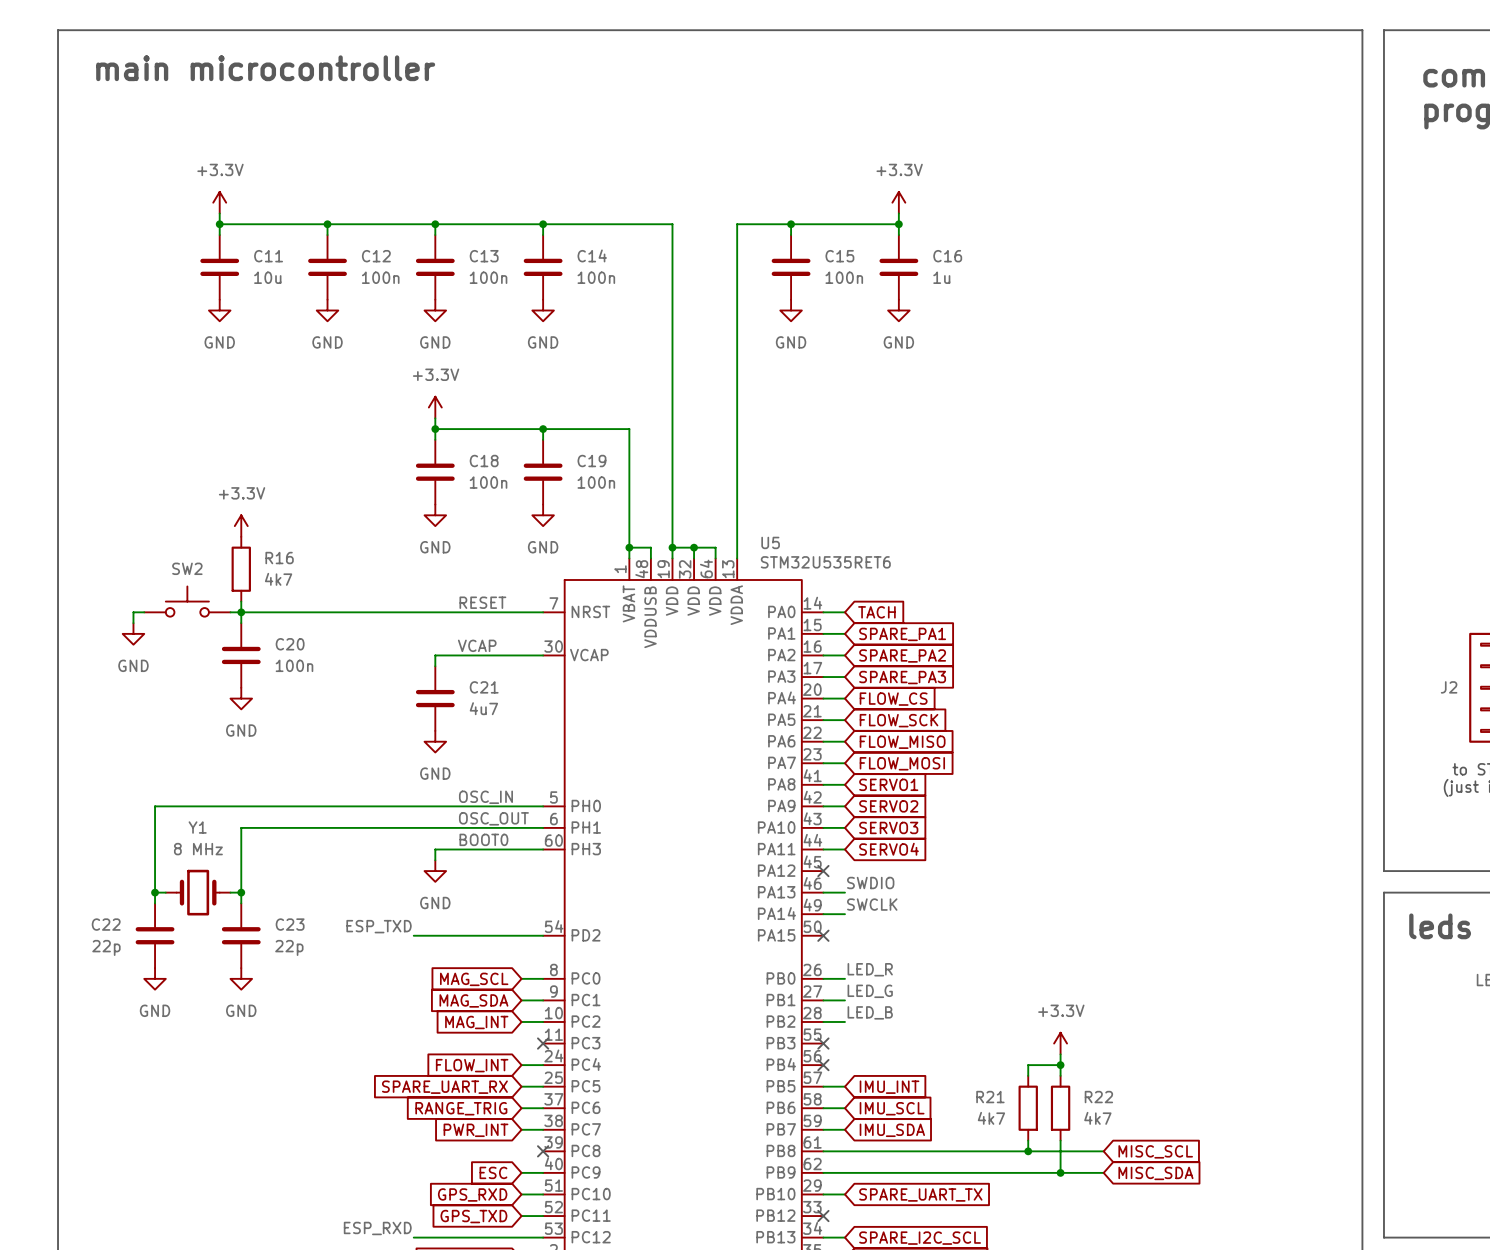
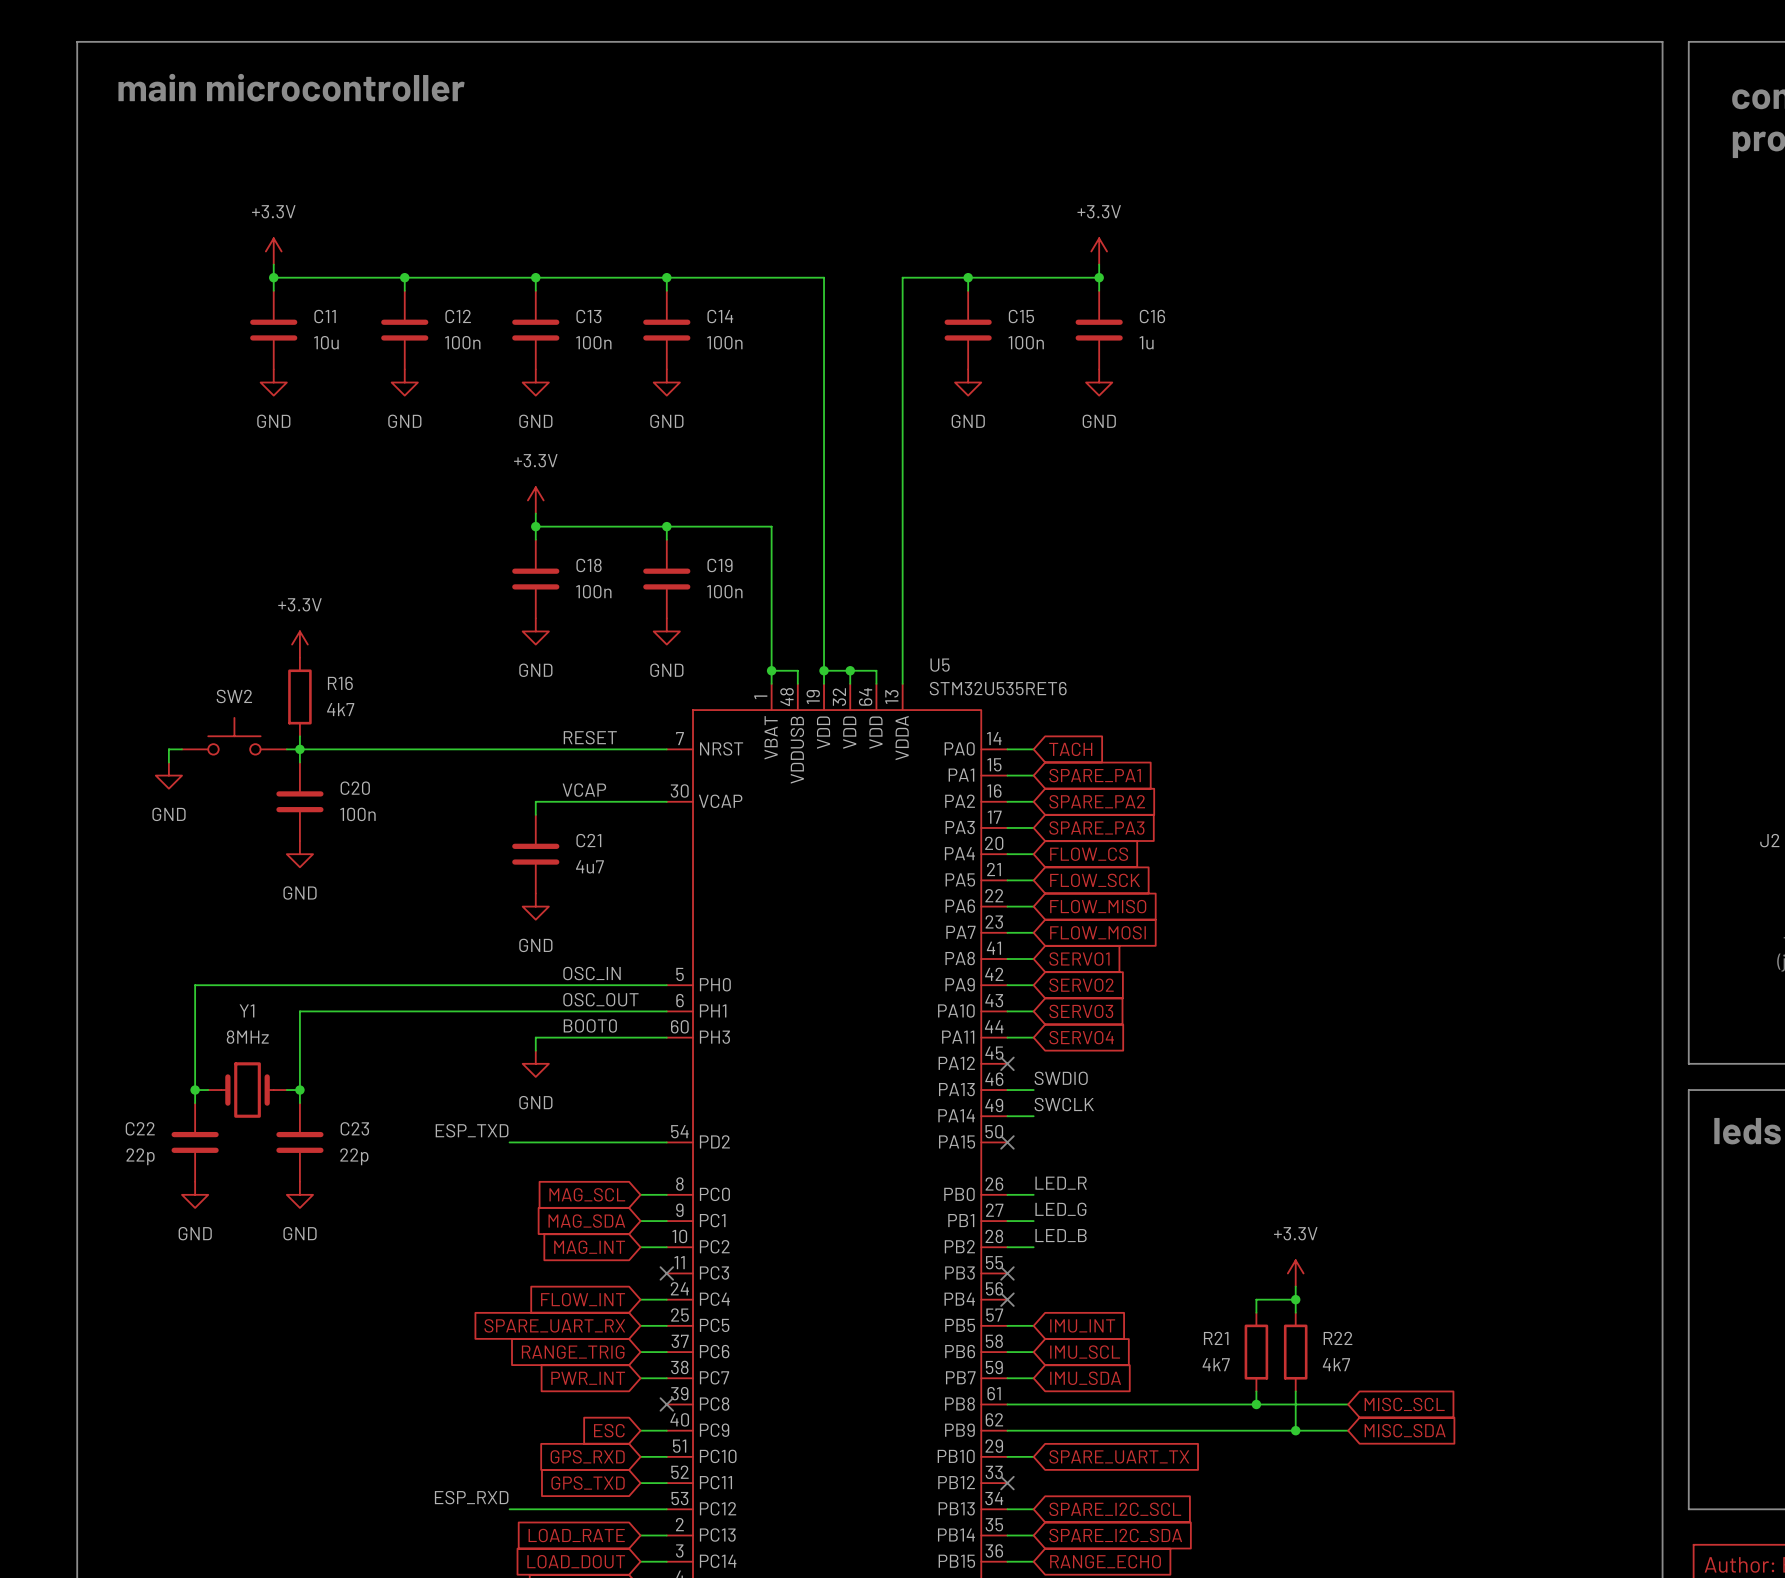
Y1 value: 8 MHz (198, 849) -> 8MHz (247, 1037)

